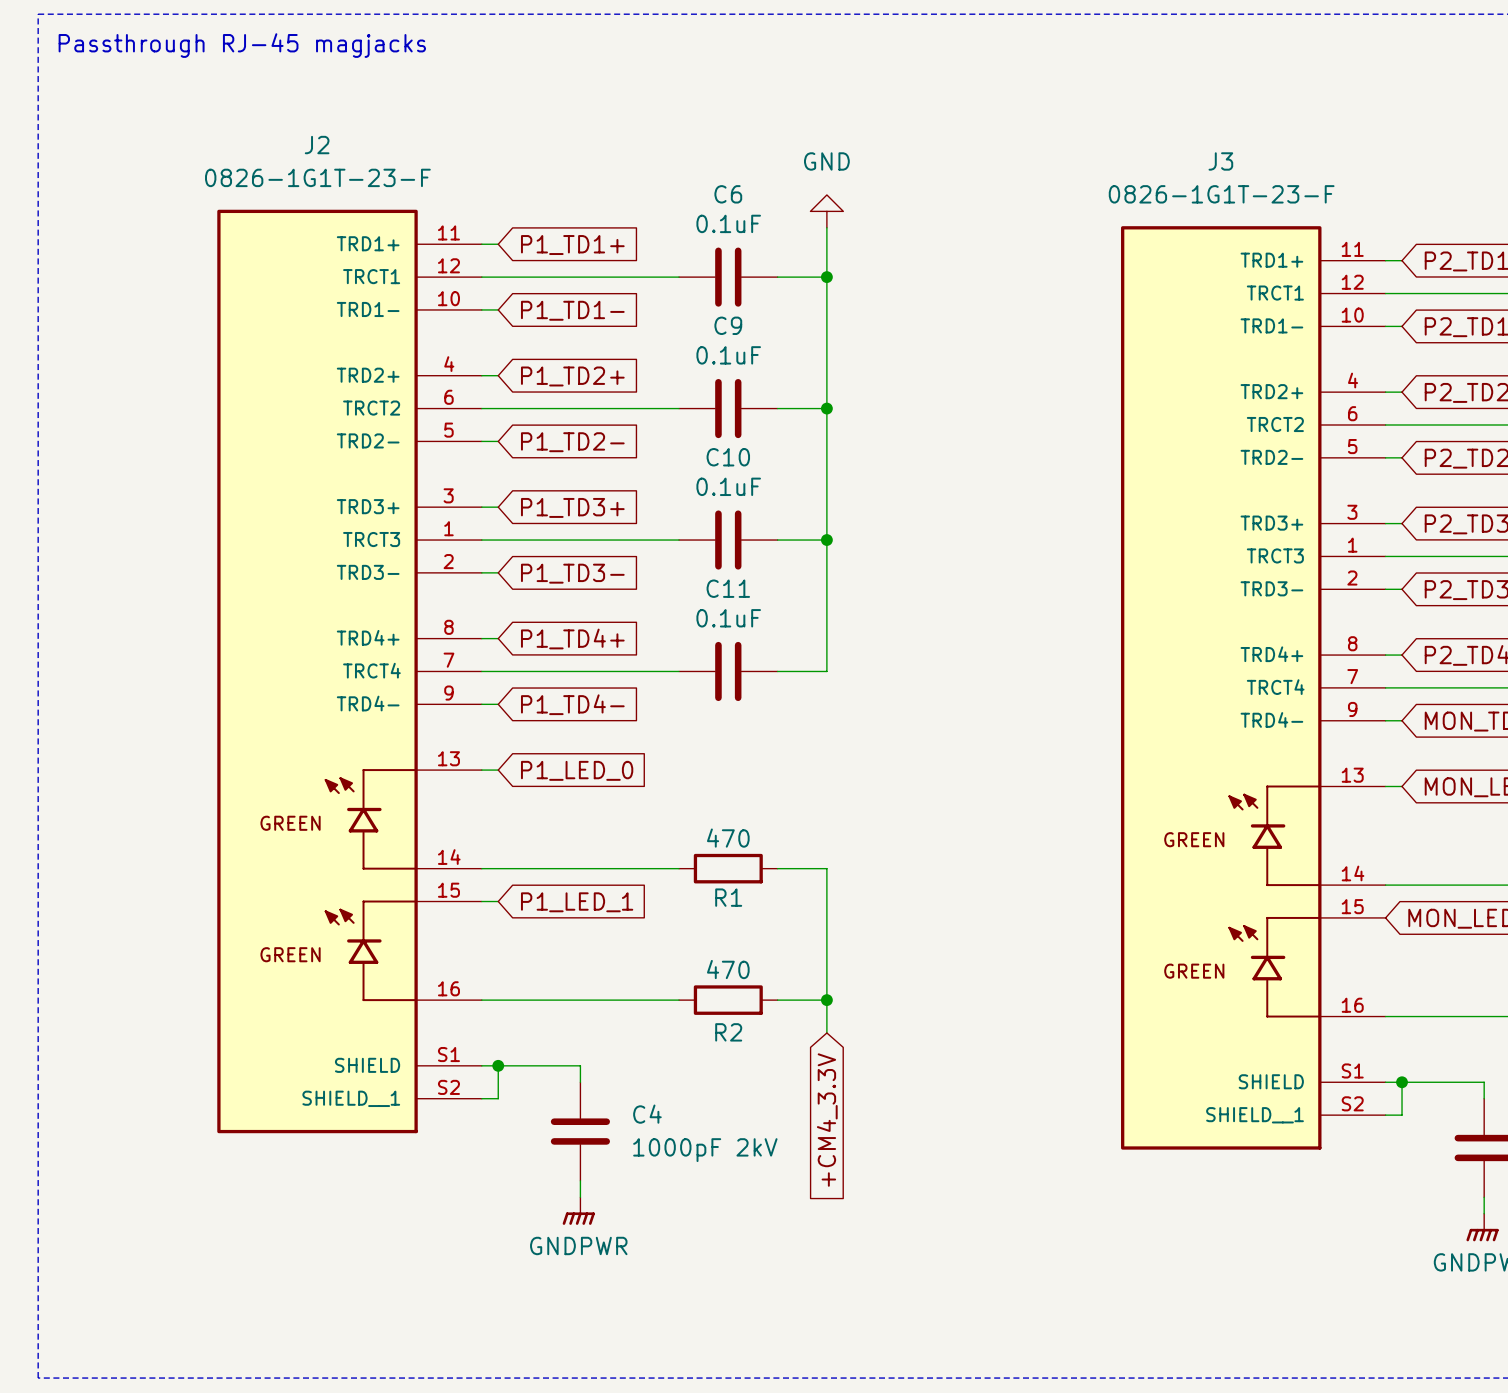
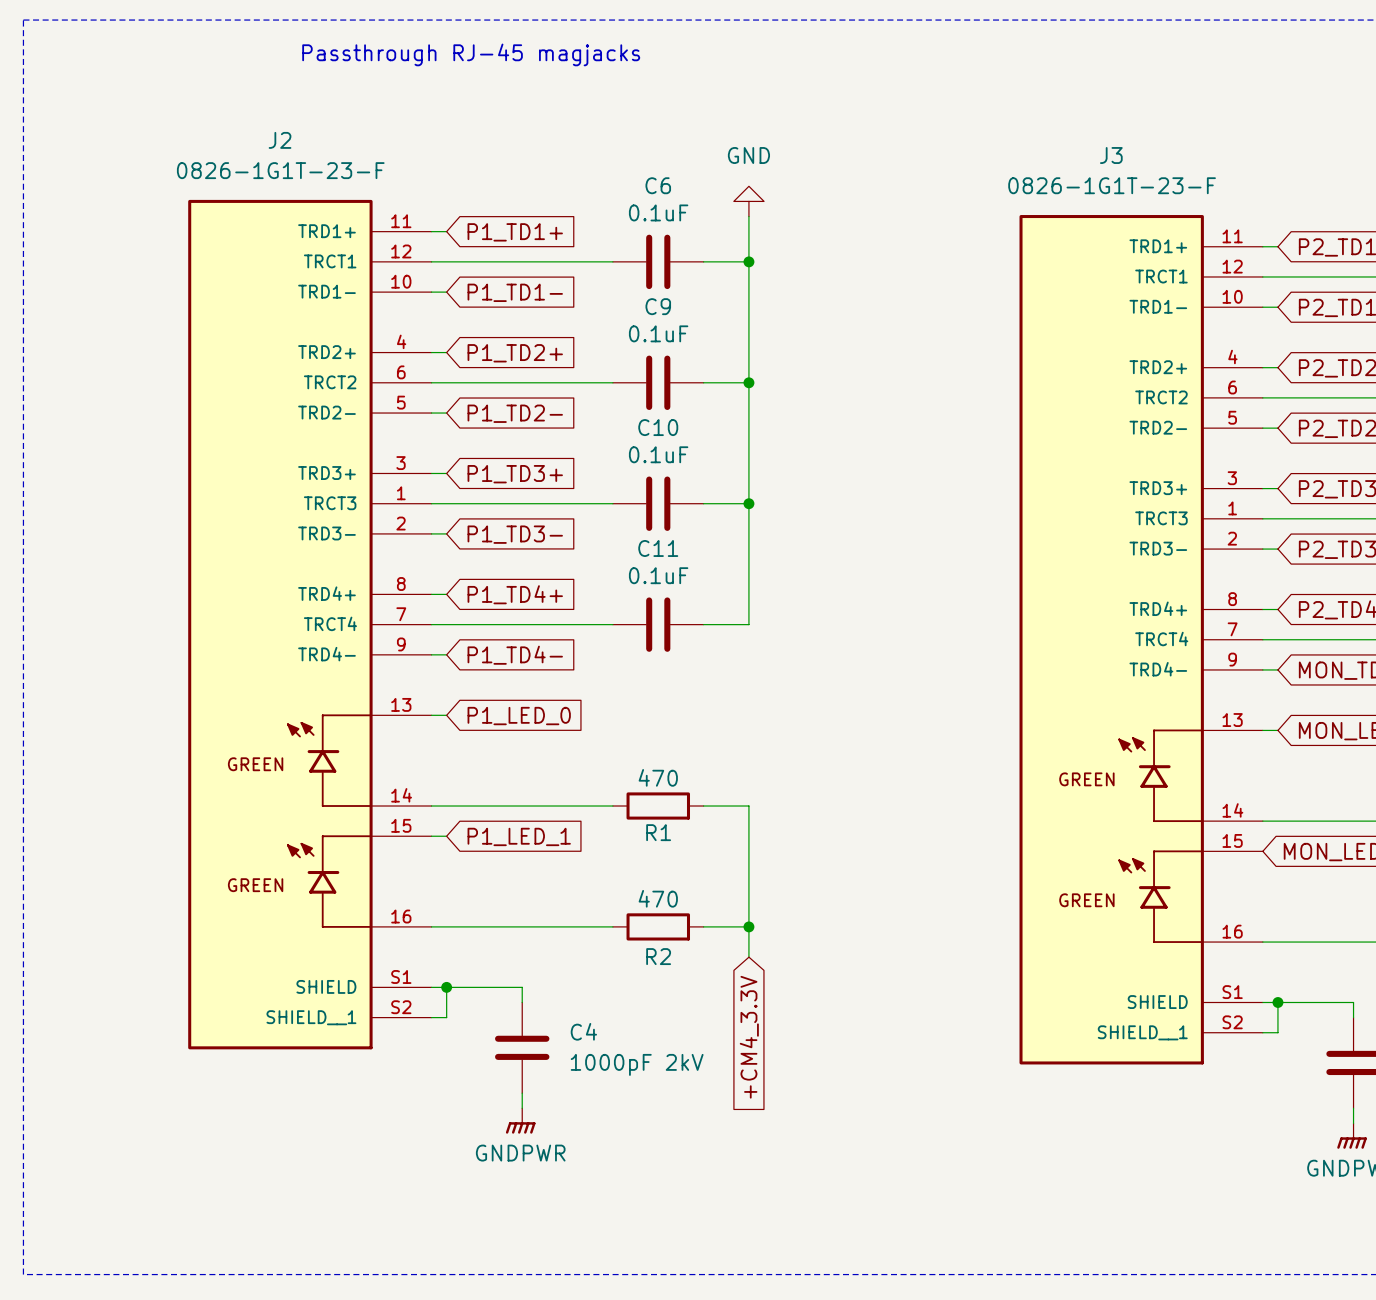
text position: Passthrough RJ-45 magjacks (242, 45) -> Passthrough RJ-45 magjacks (471, 54)

